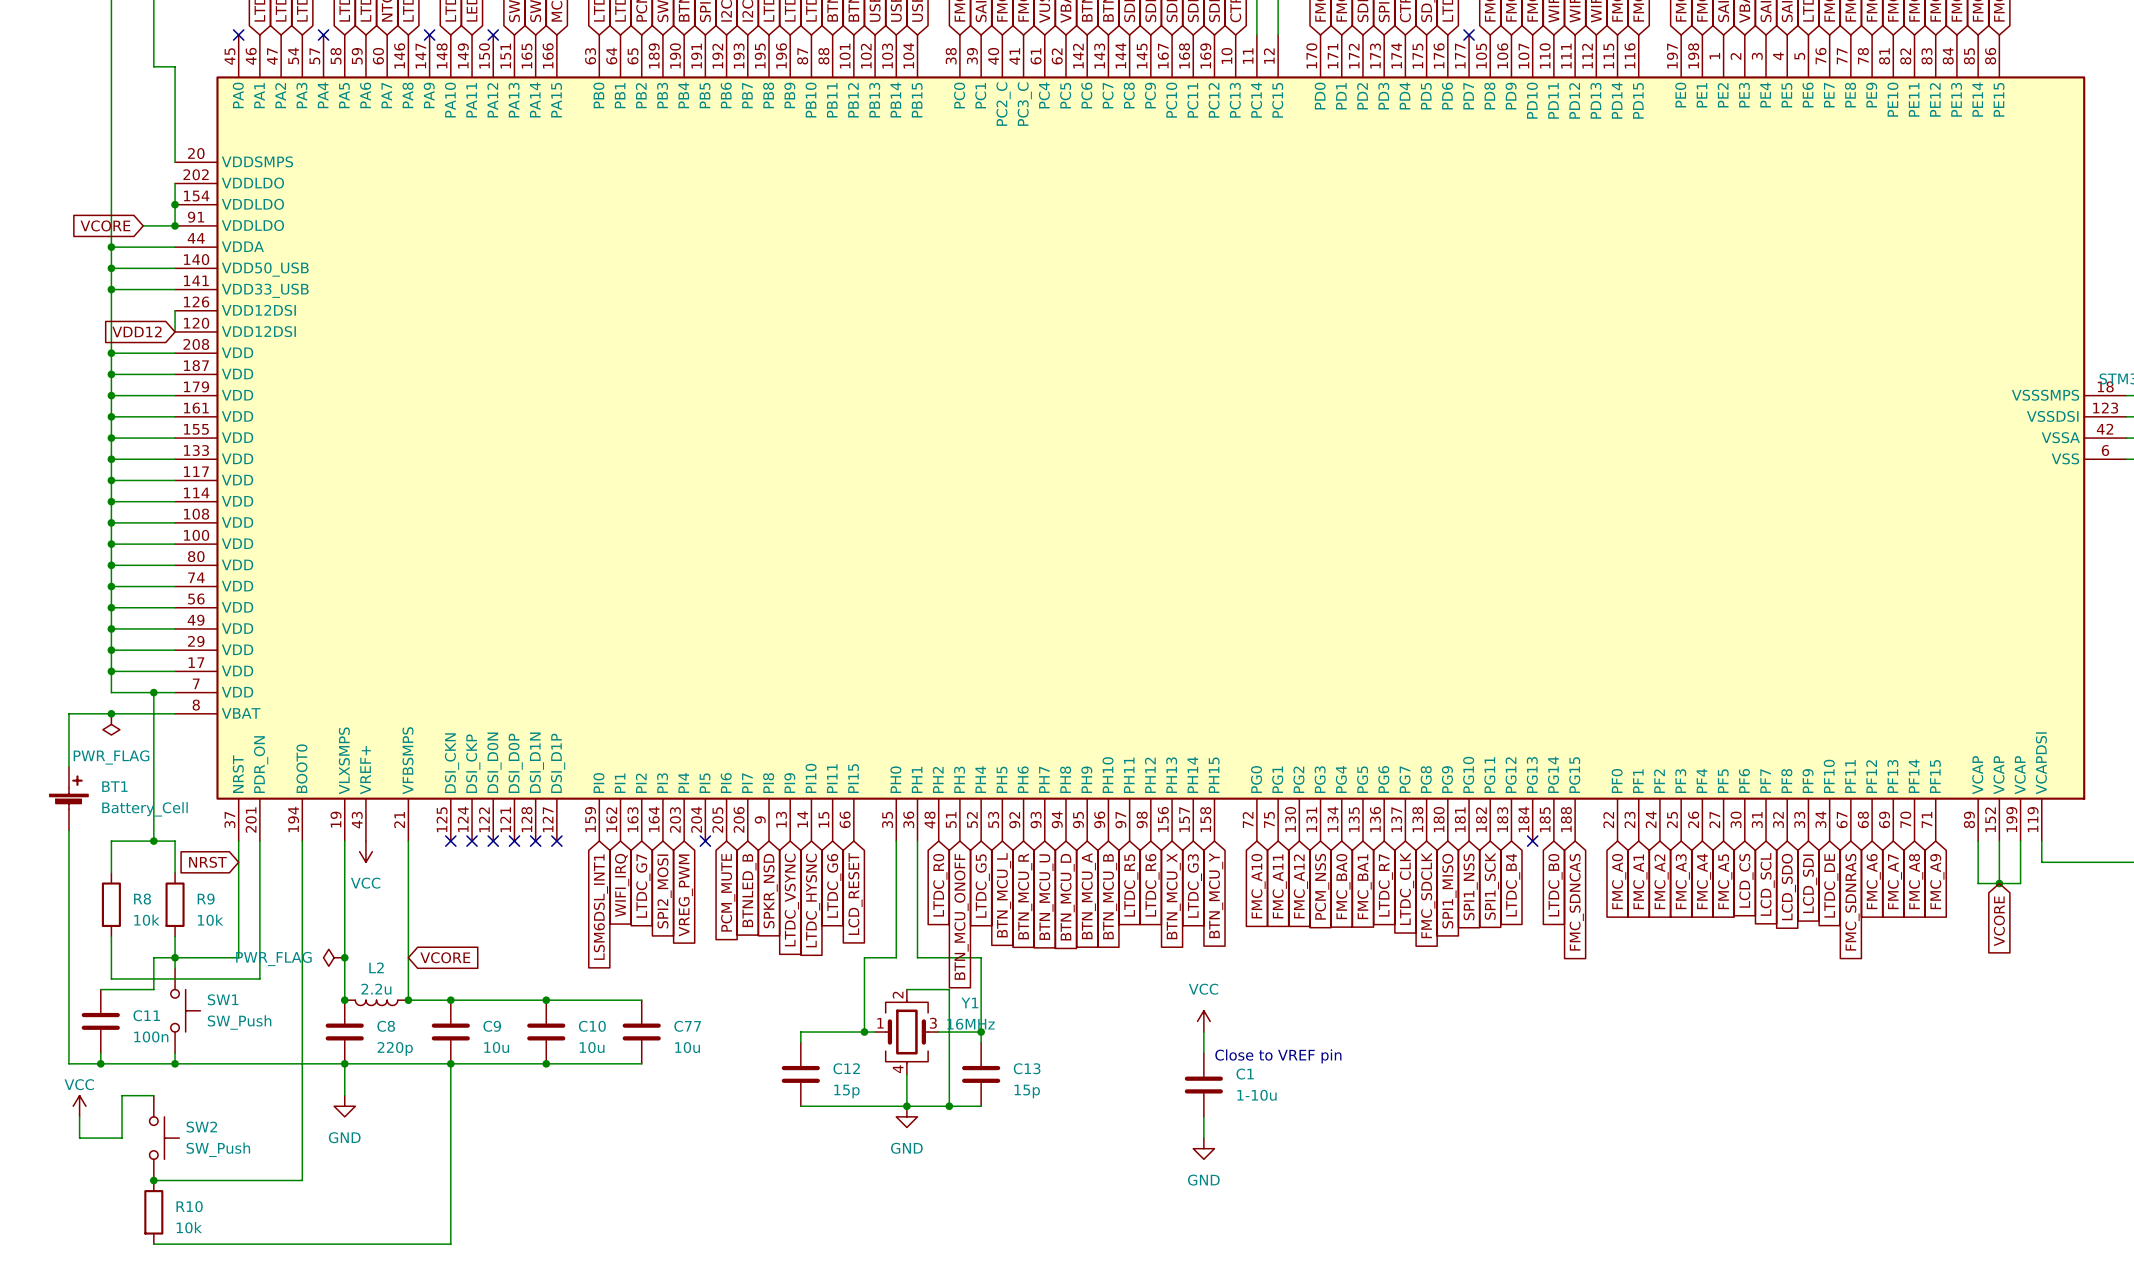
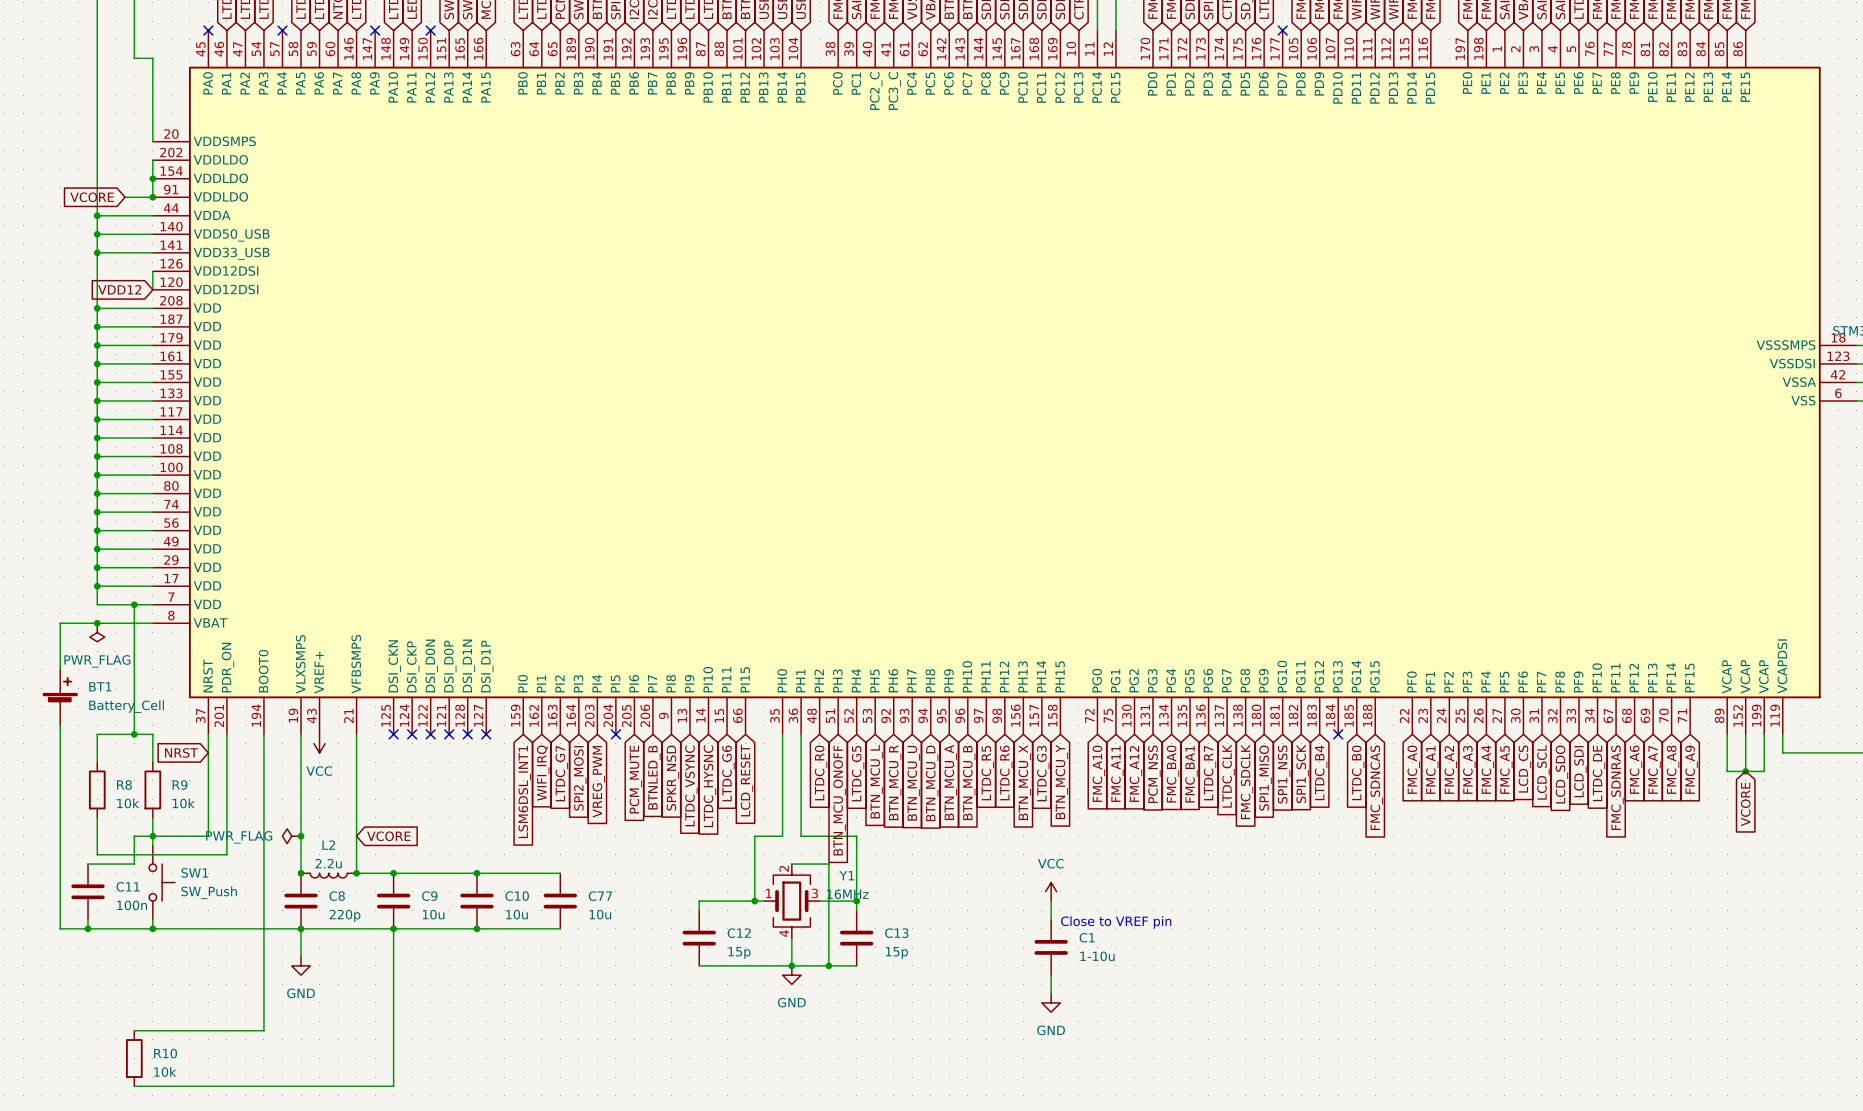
wire: (153, 1095) (122, 1095) (122, 1138) (79, 1138) (79, 1116) -> none
power symbol: VCC (79, 1106) -> none
SW2: SW_Push (164, 1138) -> none
junction: (153, 1180) -> none

